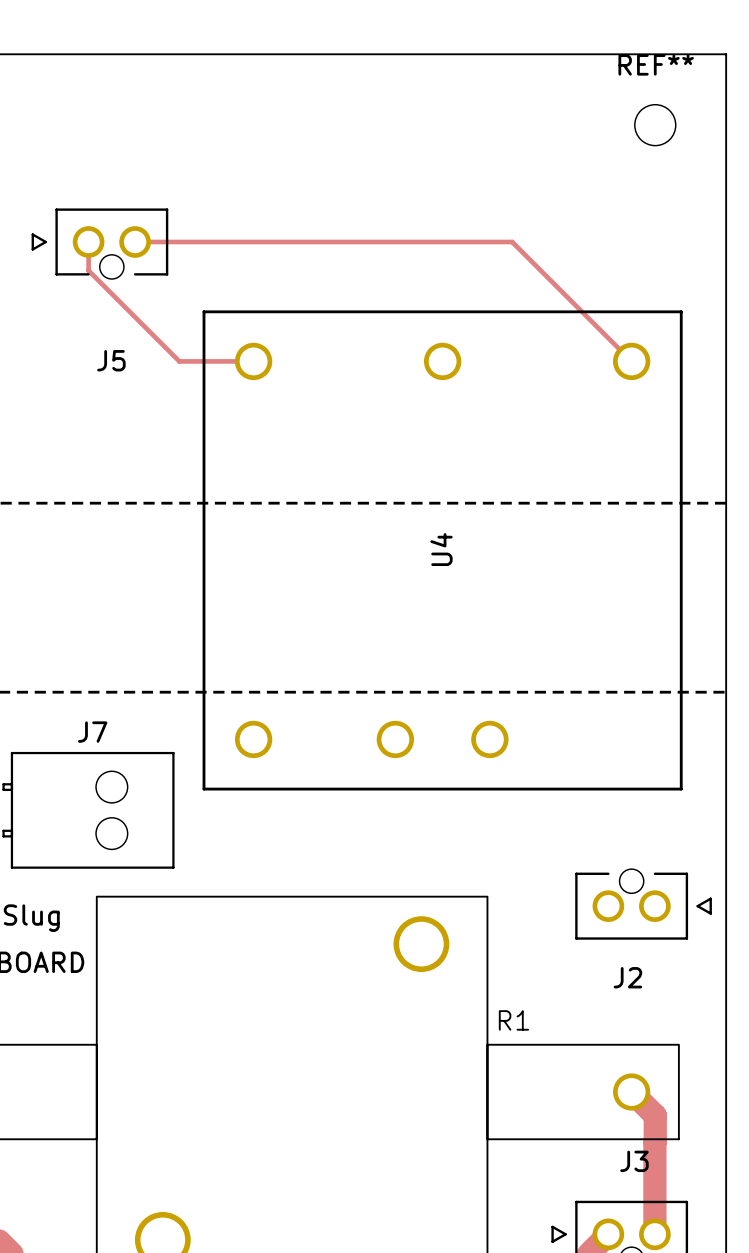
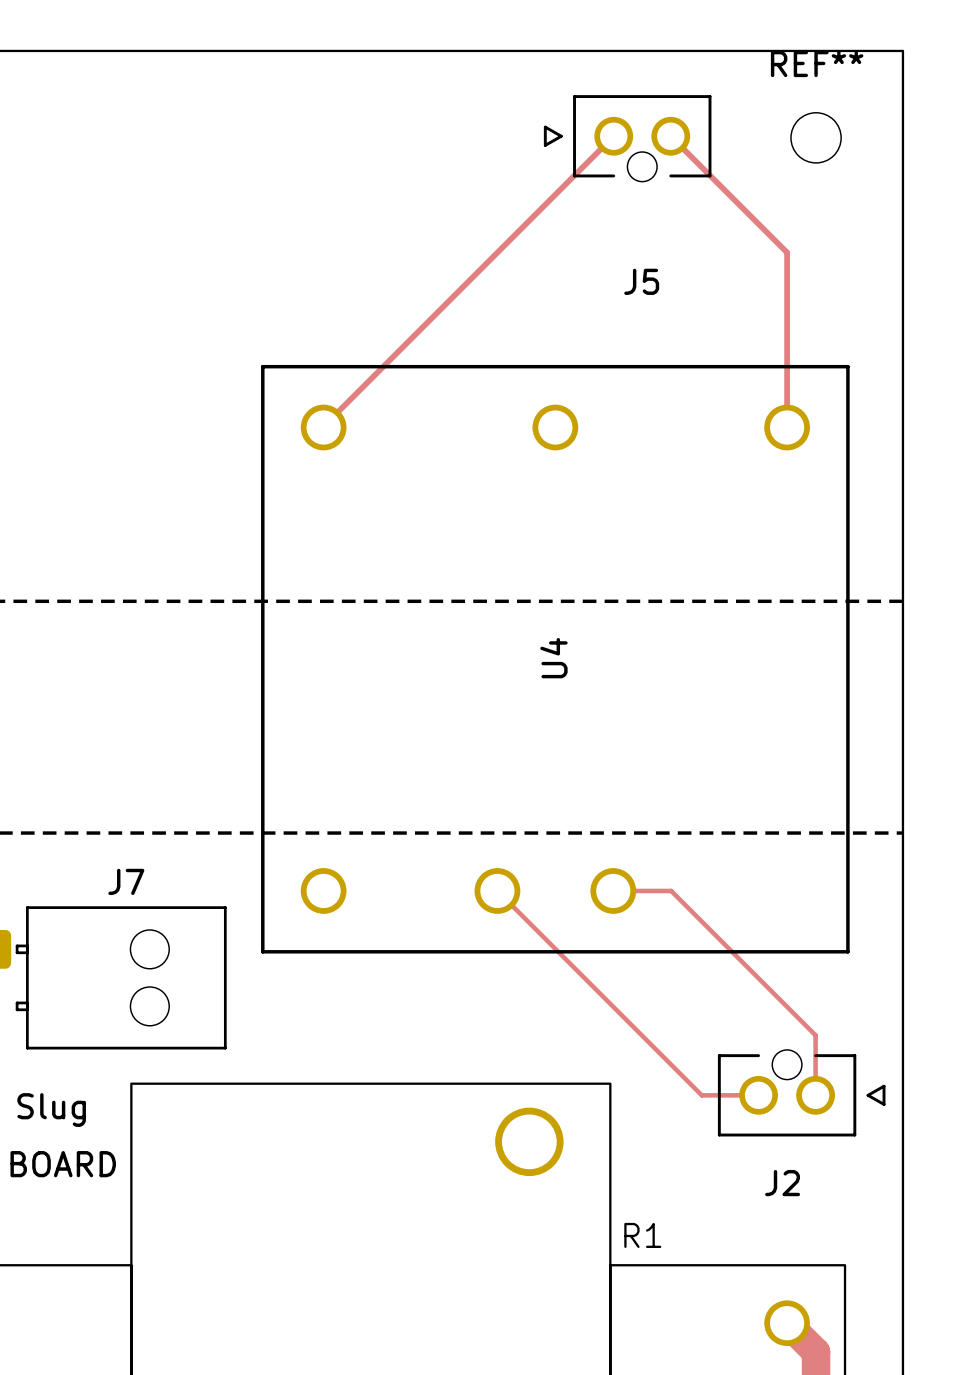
track: (88, 241) (88, 270) (179, 361) (253, 361) -> (613, 136) (323, 427)
track: (135, 241) (512, 241) (631, 361) -> (670, 136) (787, 252) (787, 427)
J5 position: (99, 243) -> (627, 138)
track: none -> (497, 890) (701, 1095) (758, 1095)
track: none -> (613, 890) (671, 890) (815, 1035) (815, 1095)

